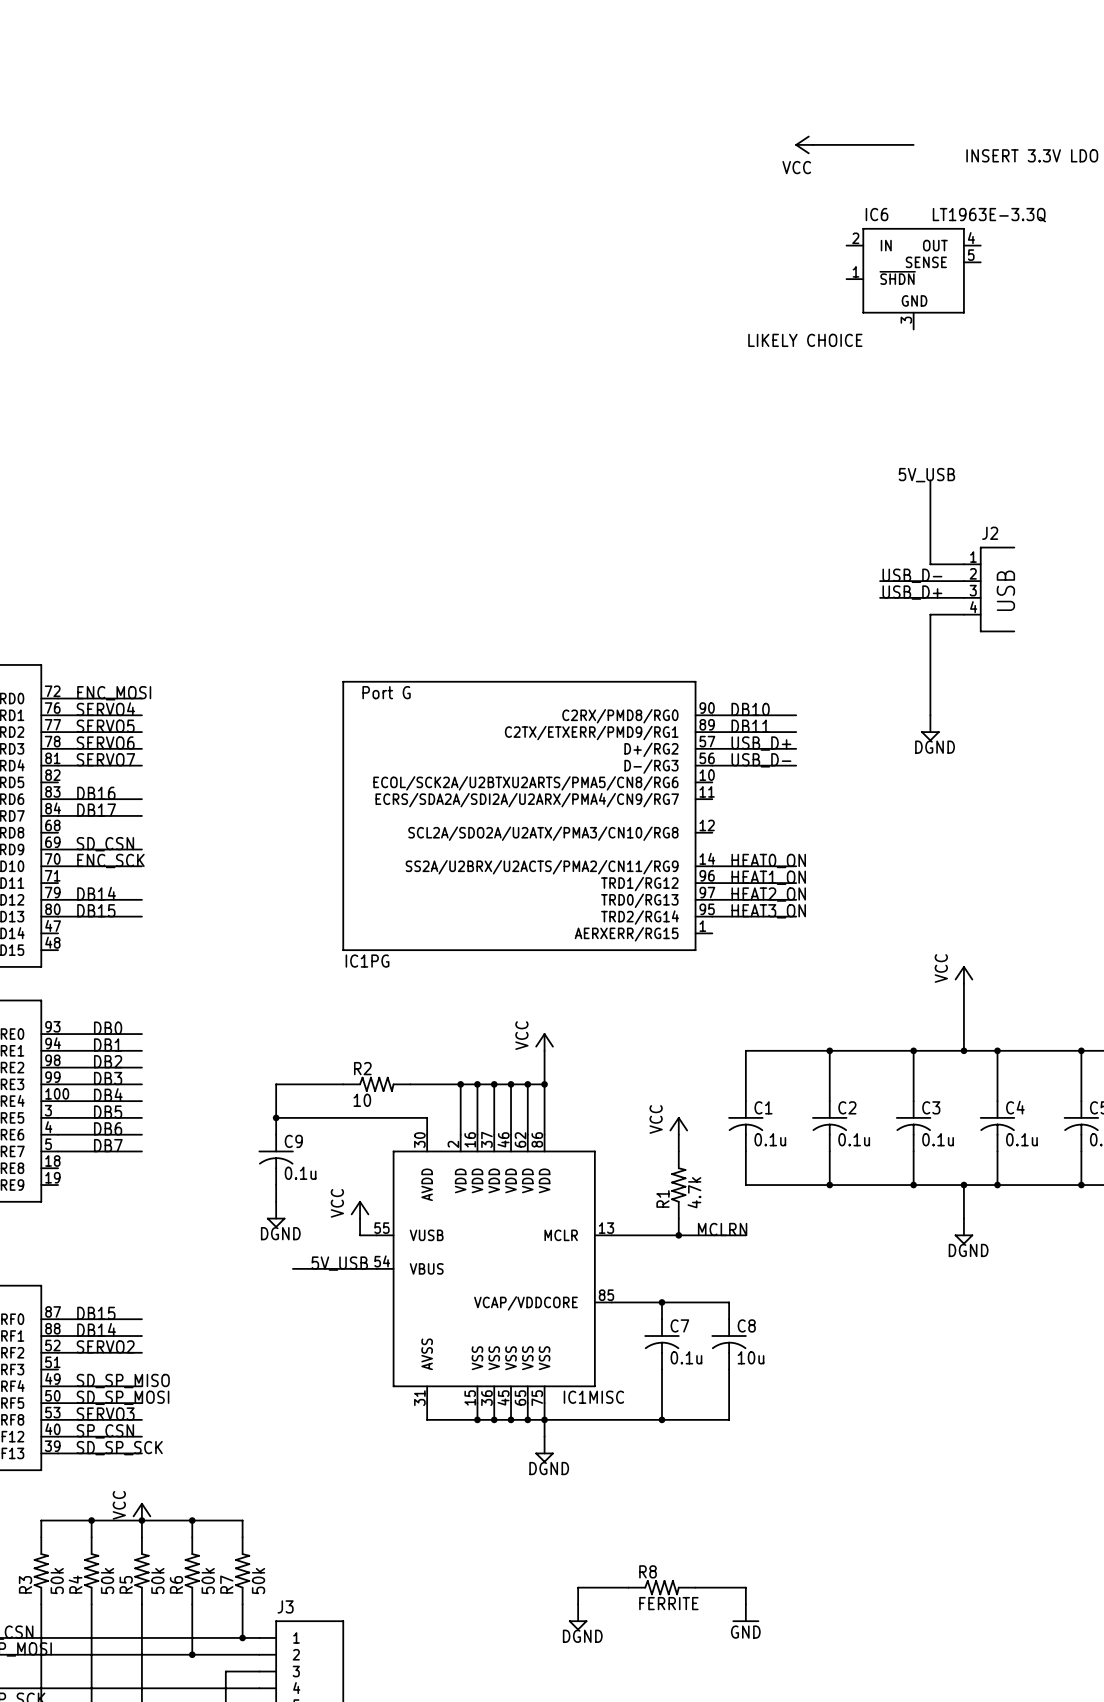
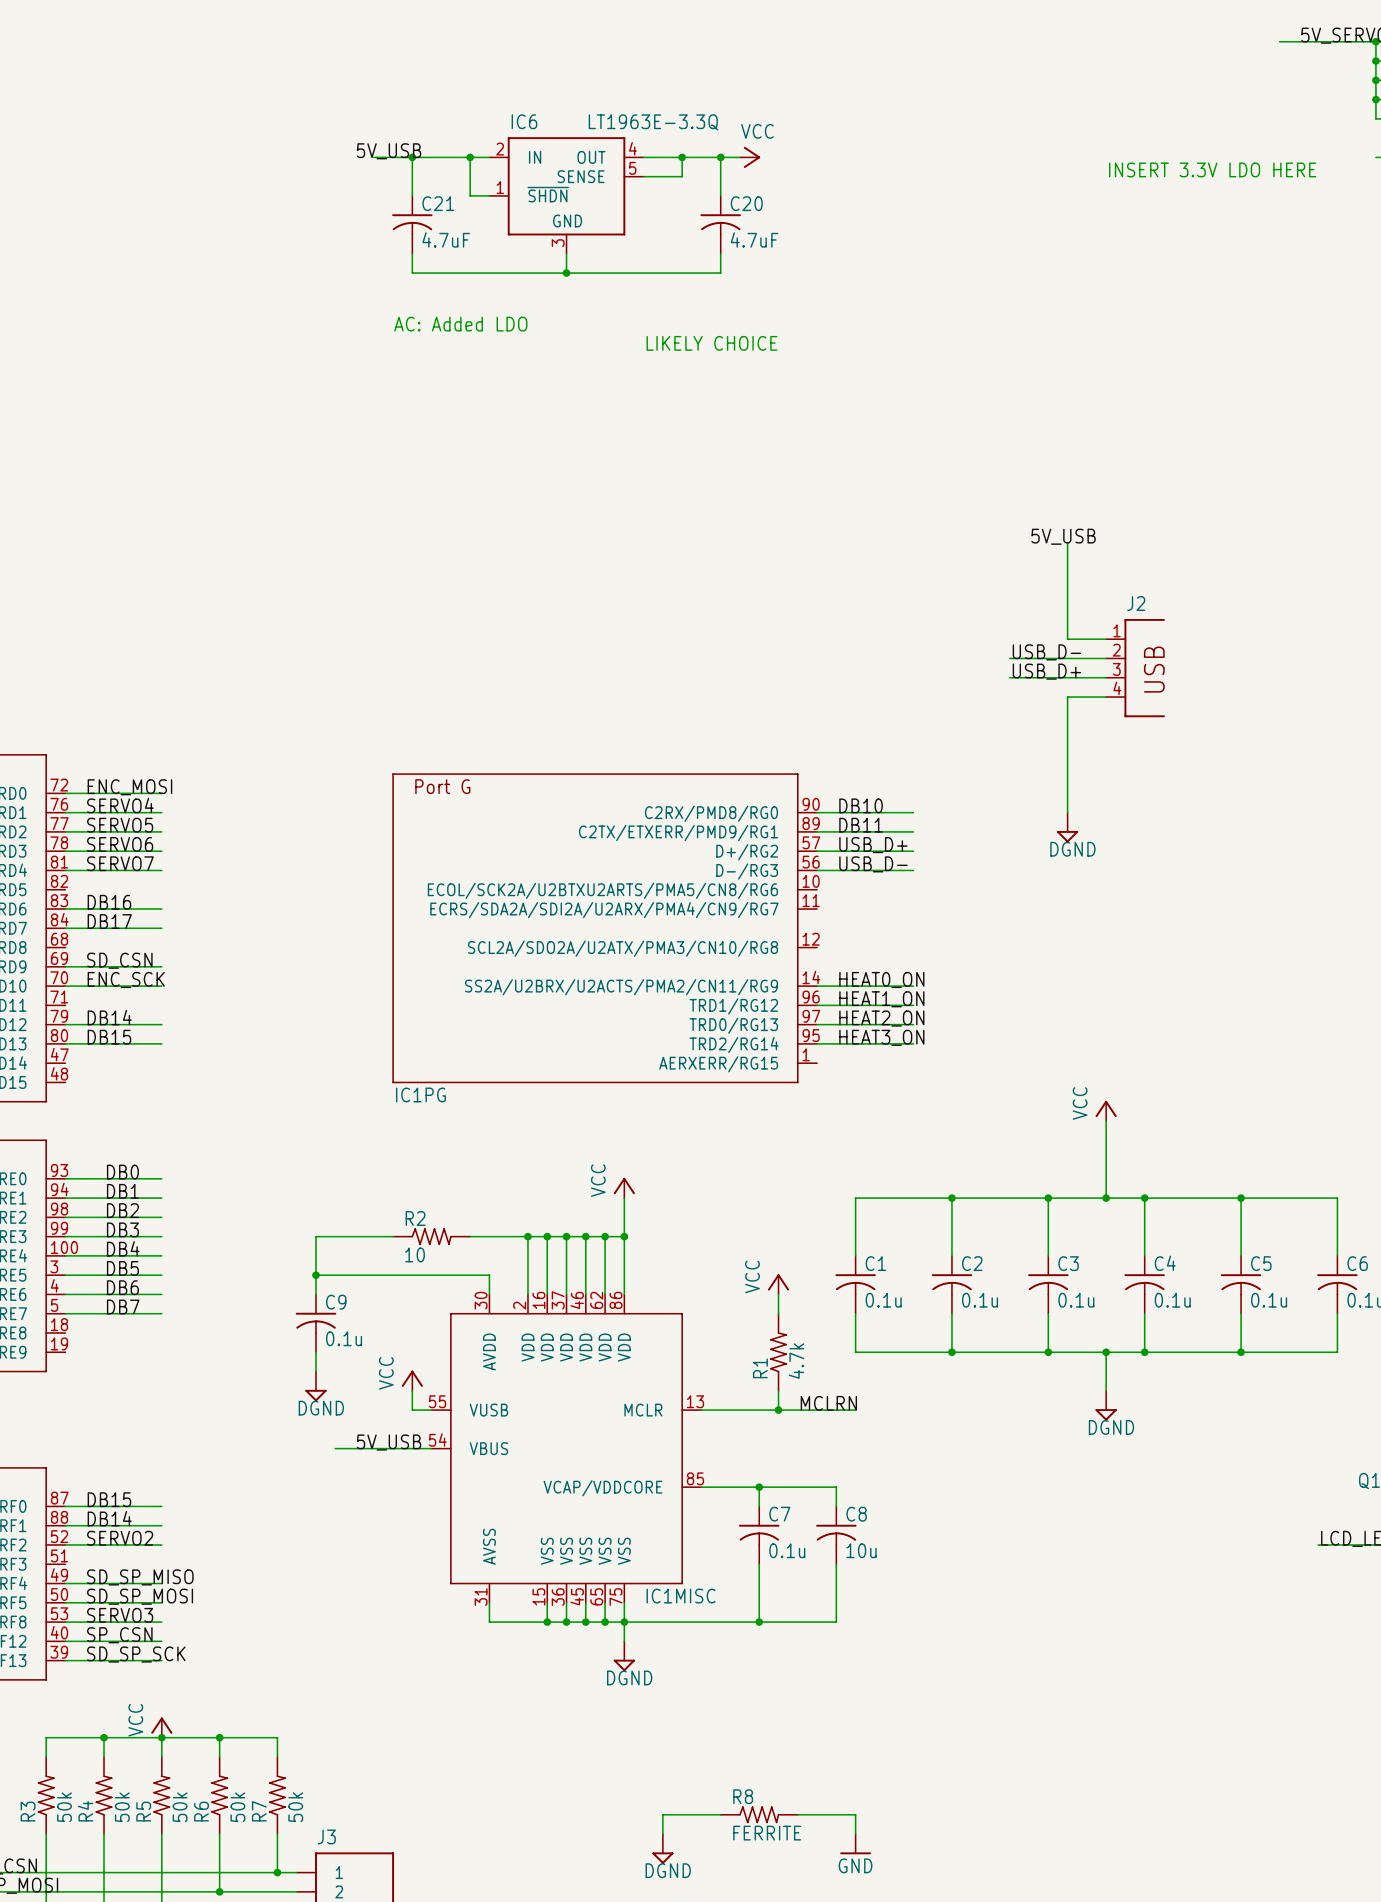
label: none -> 5V_USB (389, 151)
wire: none -> (373, 157) (489, 157)
wire: none -> (412, 157) (412, 195)
junction: none -> (412, 157)
wire: none -> (470, 157) (470, 195) (489, 195)
junction: none -> (470, 157)
wire: none -> (643, 157) (739, 157)
wire: none -> (682, 157) (682, 176) (643, 176)
junction: none -> (682, 157)
wire: none -> (720, 157) (720, 195)
junction: none -> (720, 157)
power symbol rotation: 0° (802, 144) -> 180° (752, 157)
power symbol position: VCC (804, 144) -> VCC (750, 157)
wire: (812, 144) (913, 144) -> none
C21: none -> 4.7uF (412, 224)
C20: none -> 4.7uF (720, 224)
wire: none -> (412, 253) (412, 273) (720, 273) (720, 253)
wire: none -> (566, 253) (566, 273)
junction: none -> (566, 273)
IC6 position: (913, 278) -> (566, 195)
text: none -> AC: Added LDO (460, 324)
text: none -> LIKELY CHOICE (711, 343)
text: LIKELY CHOICE (805, 340) -> none

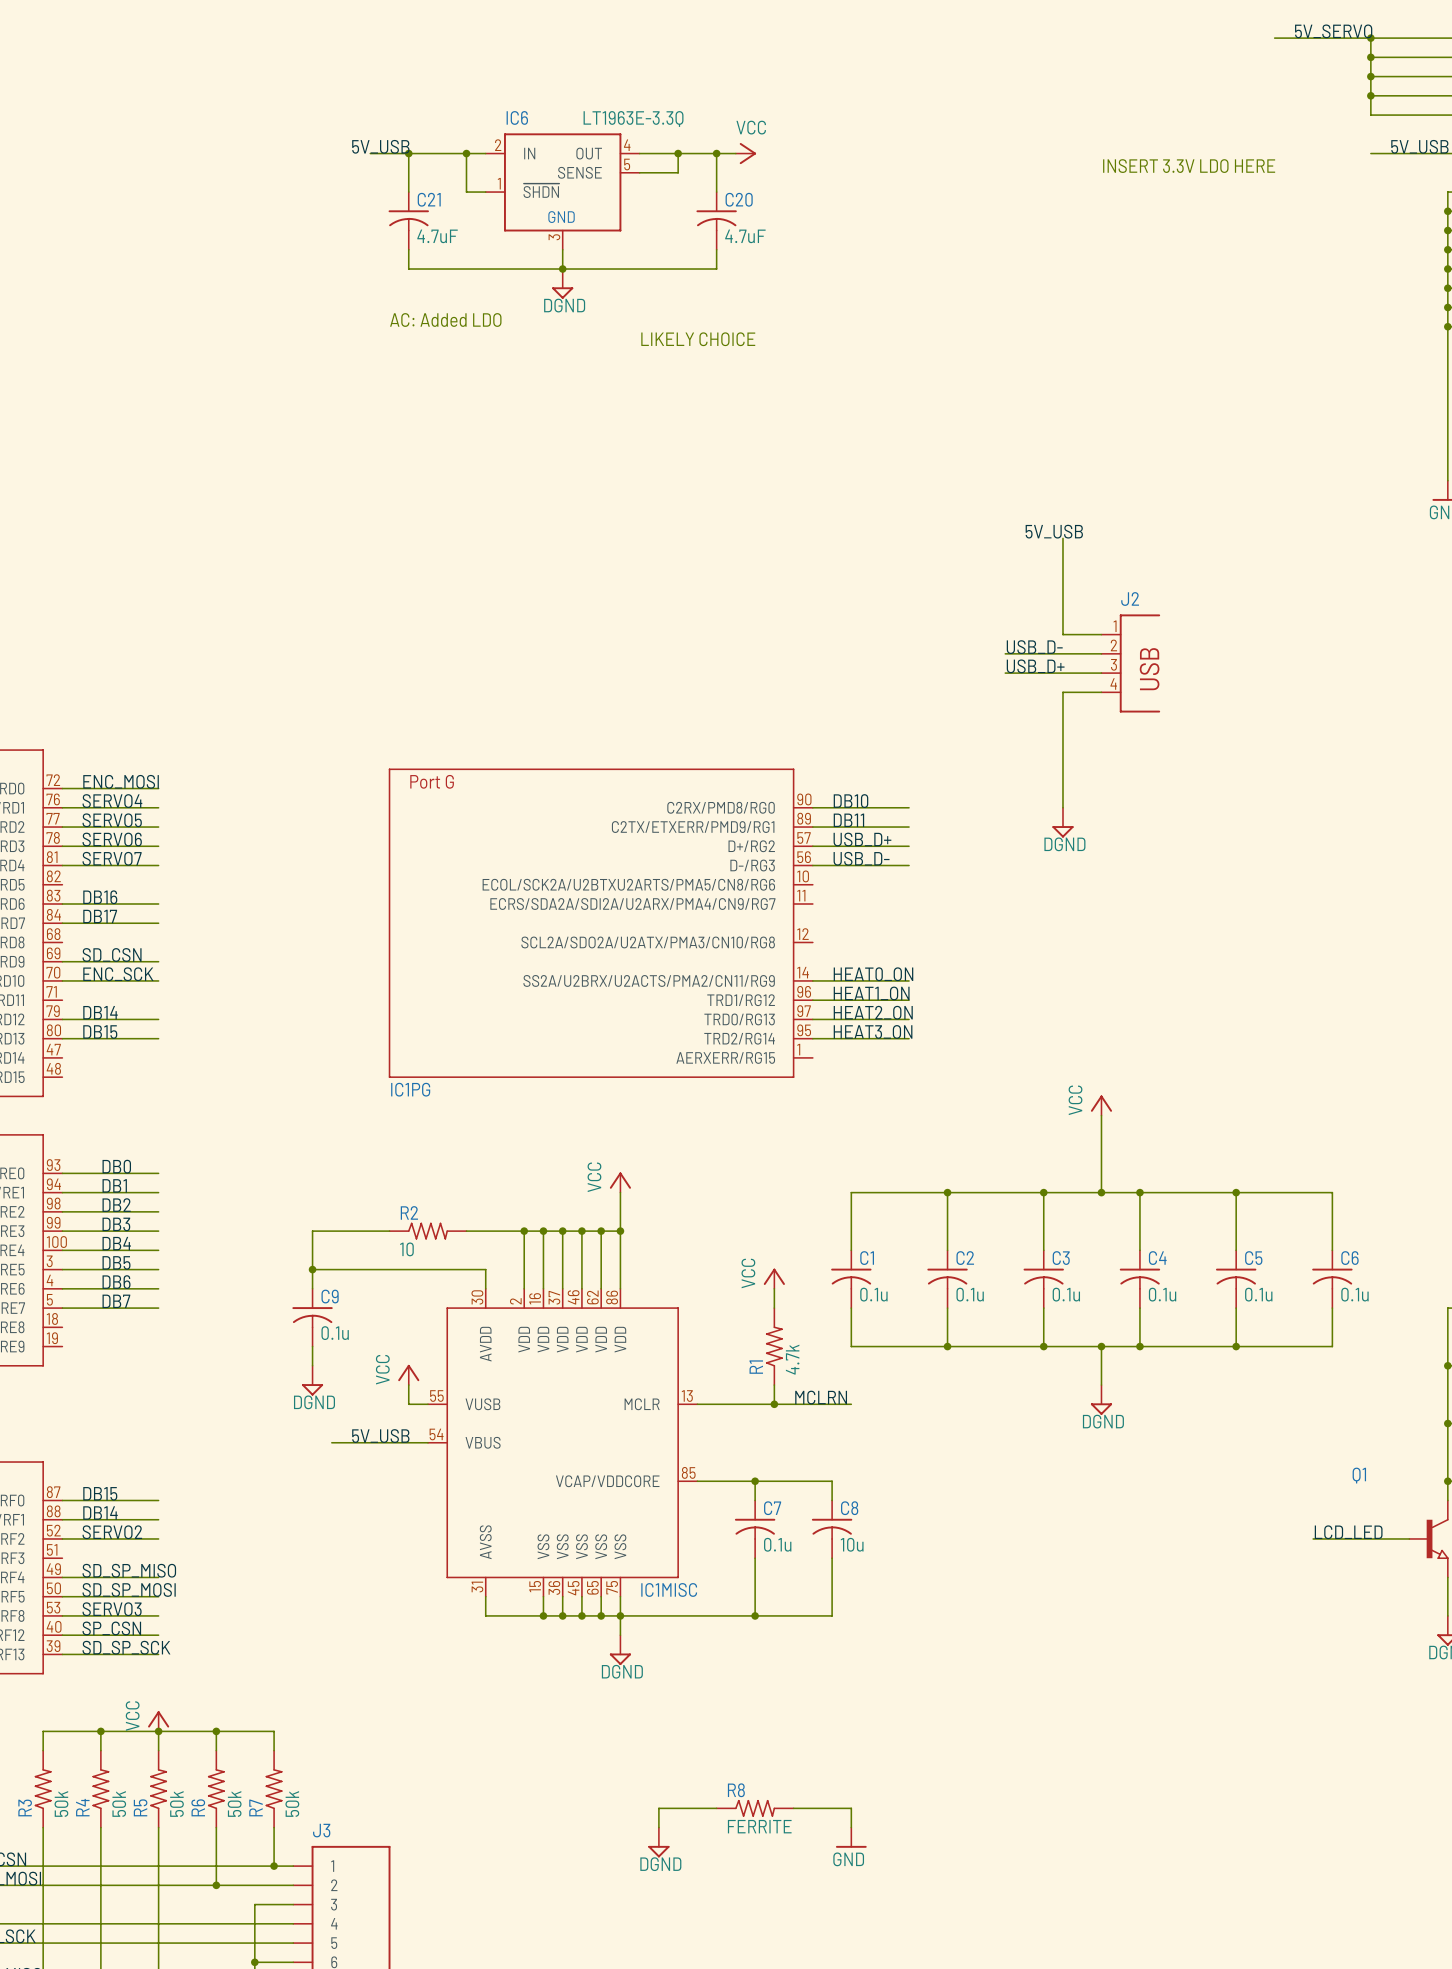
power symbol: none -> DGND (562, 283)

